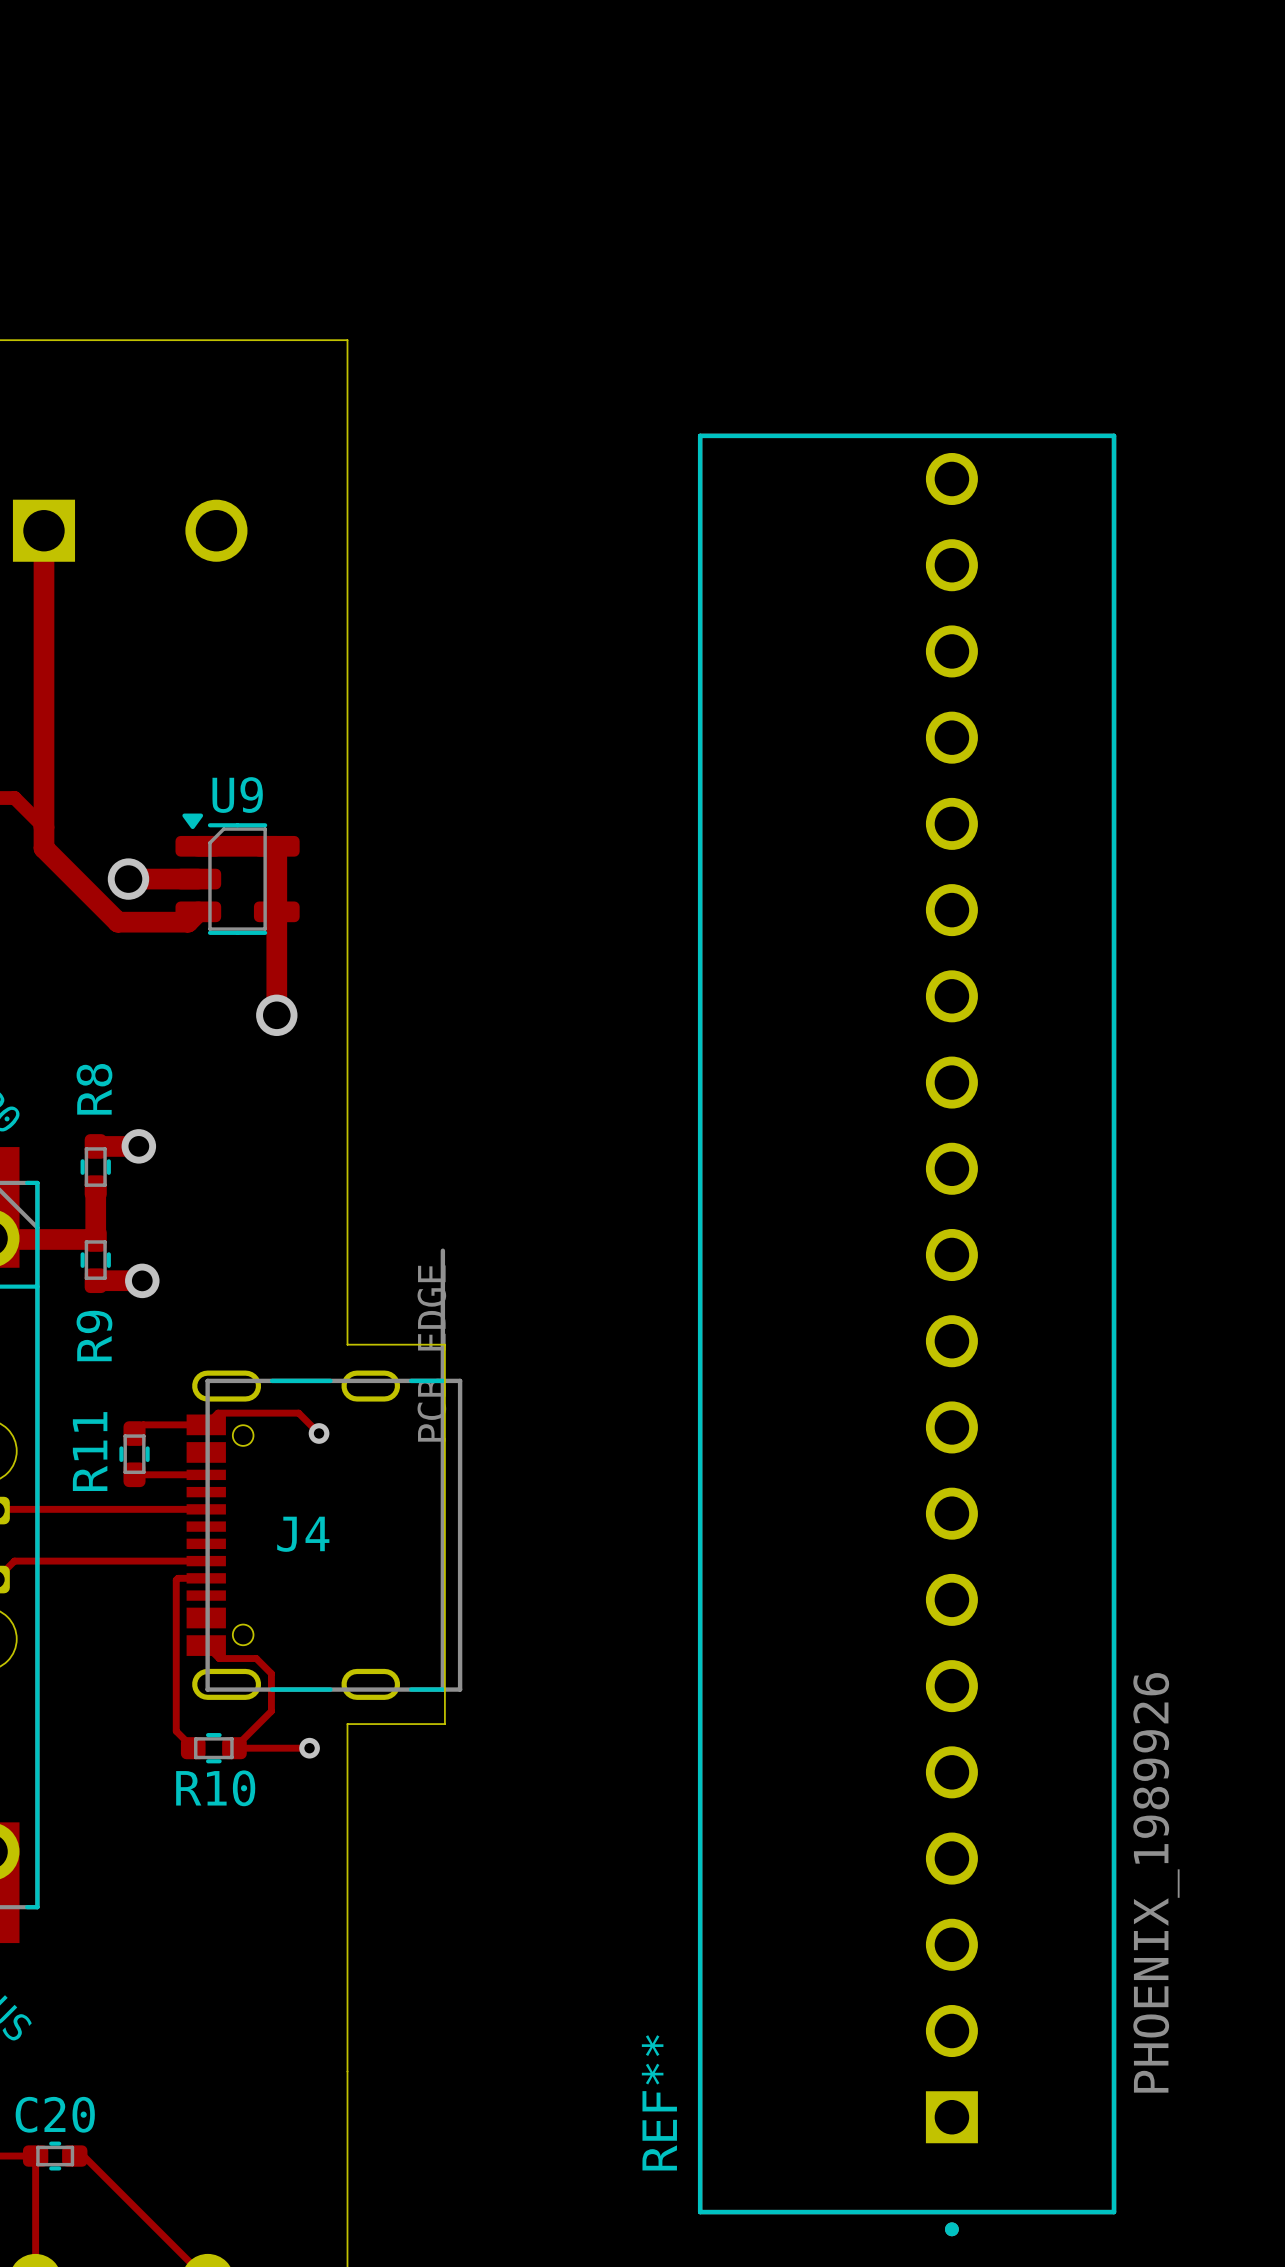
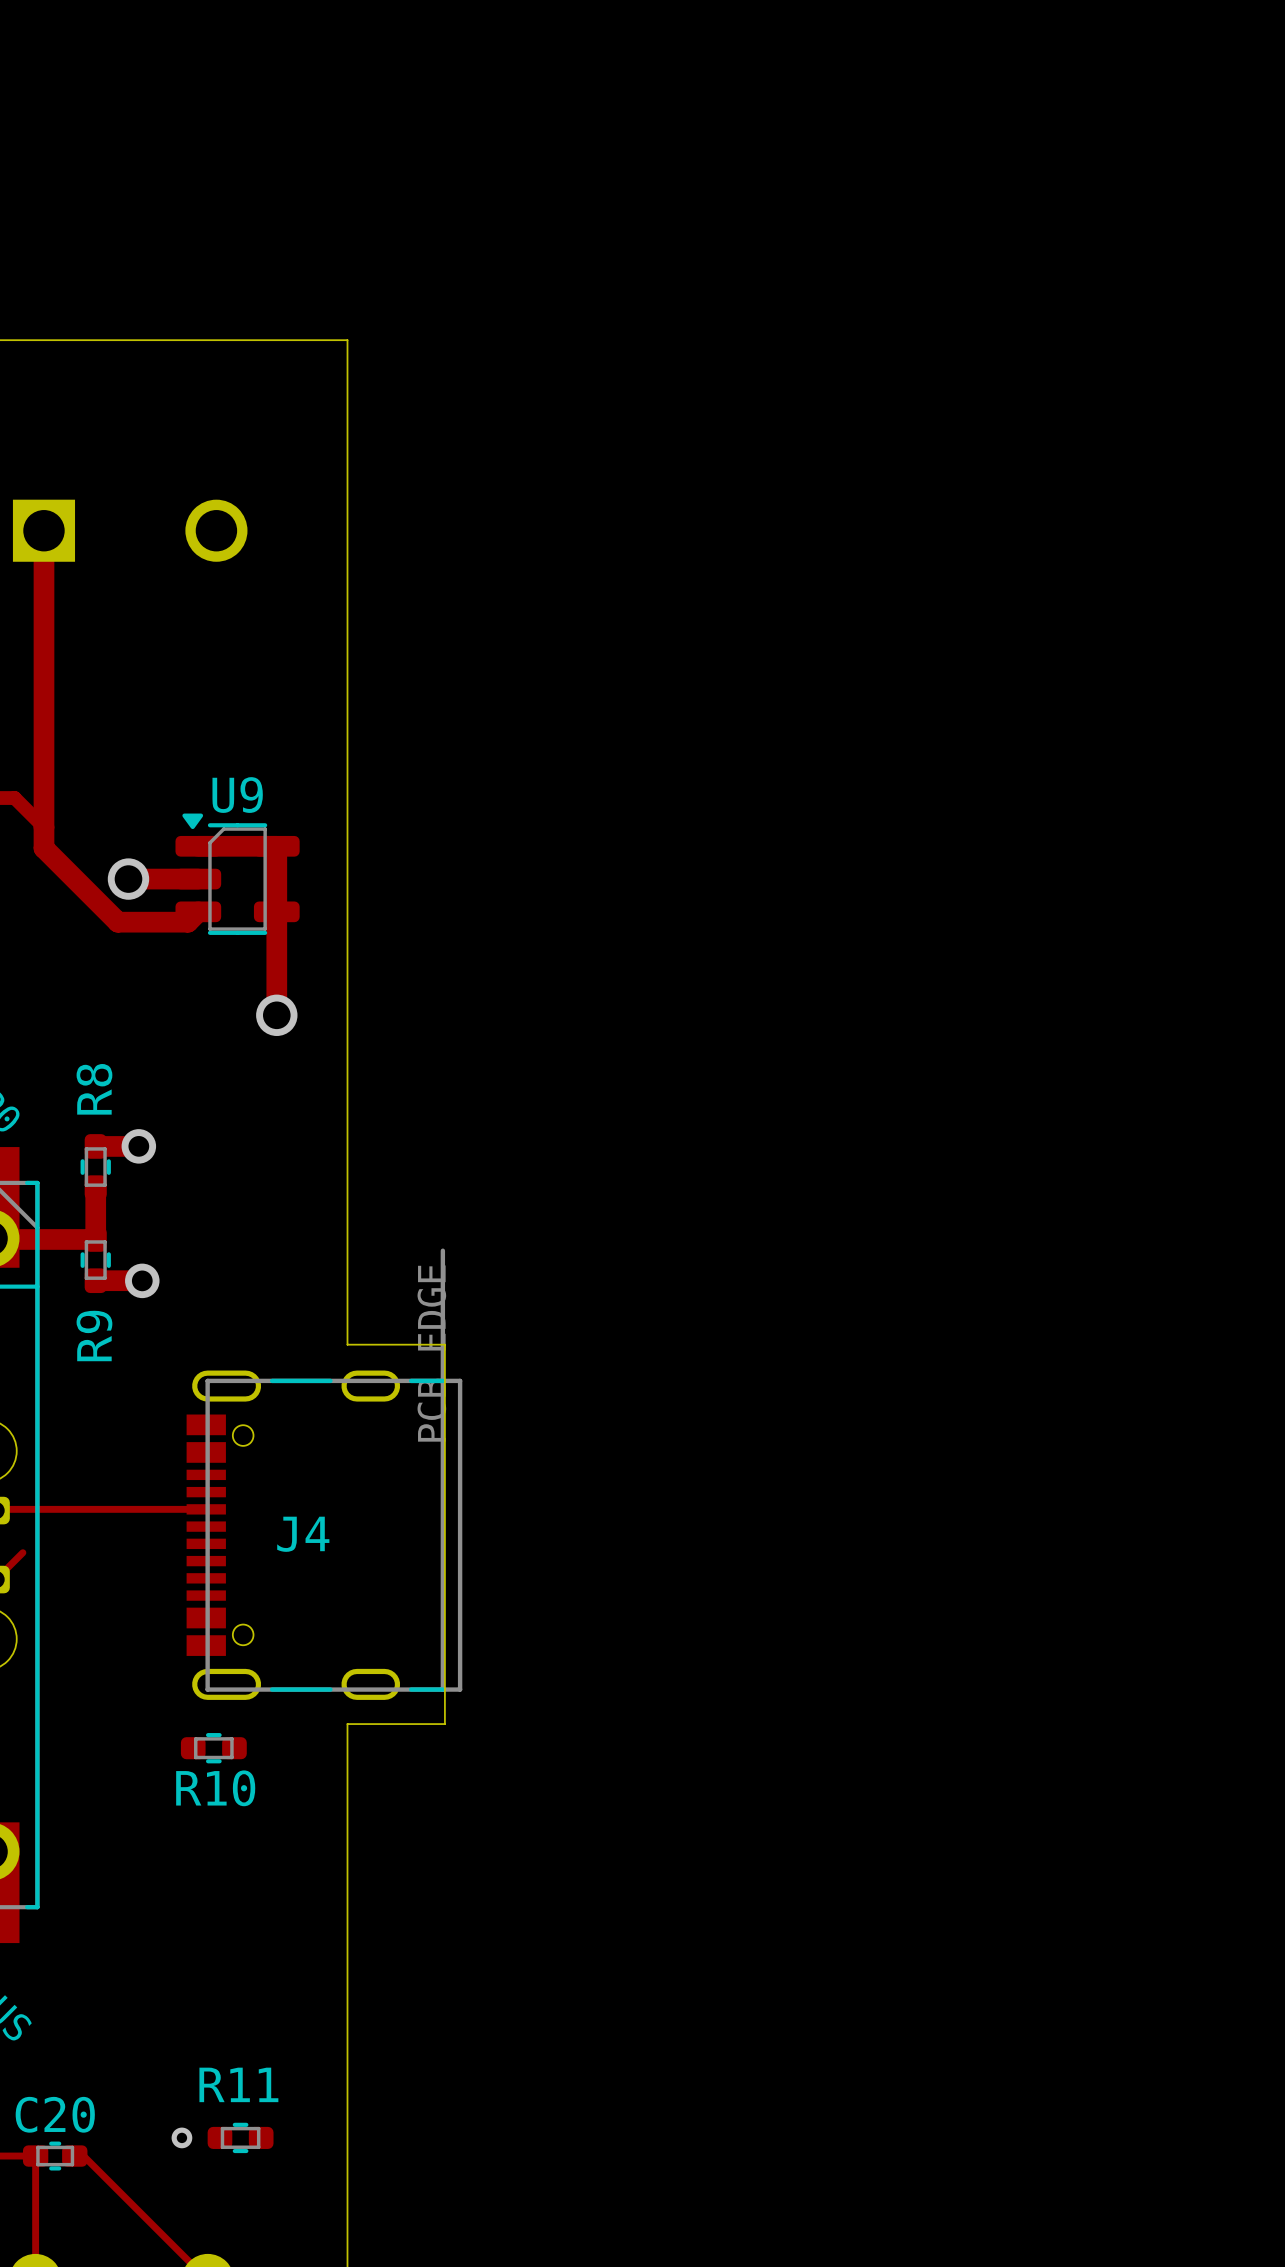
REF**: PHOENIX_1989926 (907, 1334) -> none
track: (134, 1433) (143, 1424) (206, 1424) (217, 1413) (298, 1413) (319, 1433) -> none
via: (319, 1433) -> none
R11 rotation: 0° (134, 1454) -> 90° clockwise (240, 2137)
R11 position: (134, 1454) -> (240, 2137)
track: (134, 1474) (206, 1474) -> none
track: (14, 1561) (206, 1561) -> (14, 1561) (22, 1552)
track: (206, 1578) (177, 1578) (176, 1580) (176, 1731) (193, 1748) -> none
track: (206, 1645) (219, 1658) (256, 1658) (271, 1673) (271, 1711) (234, 1748) (309, 1748) -> none
via: (309, 1748) -> none
via: none -> (181, 2137)

